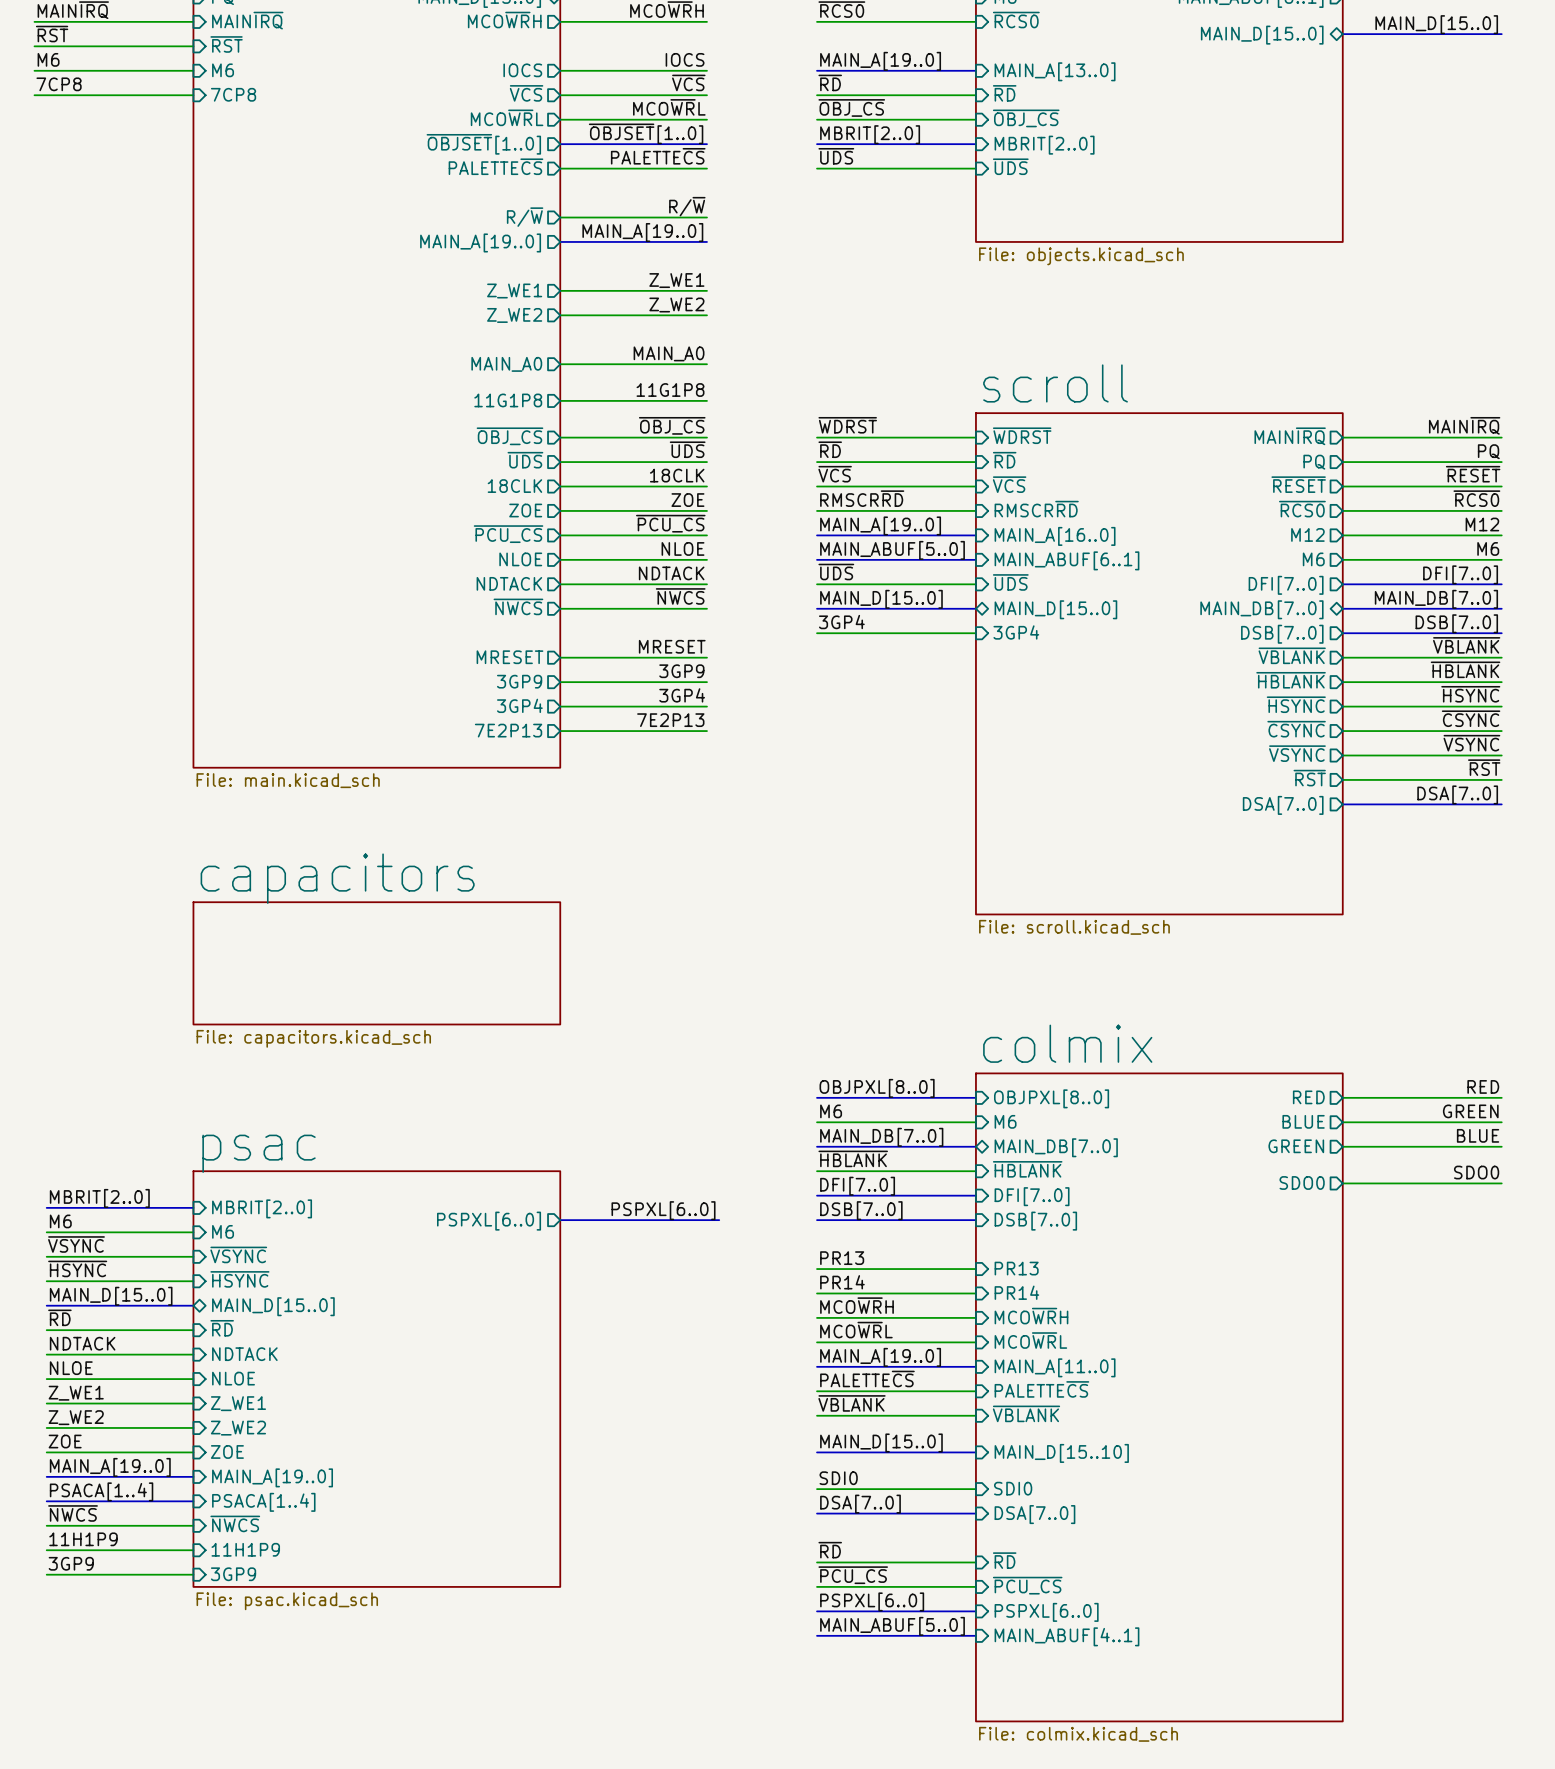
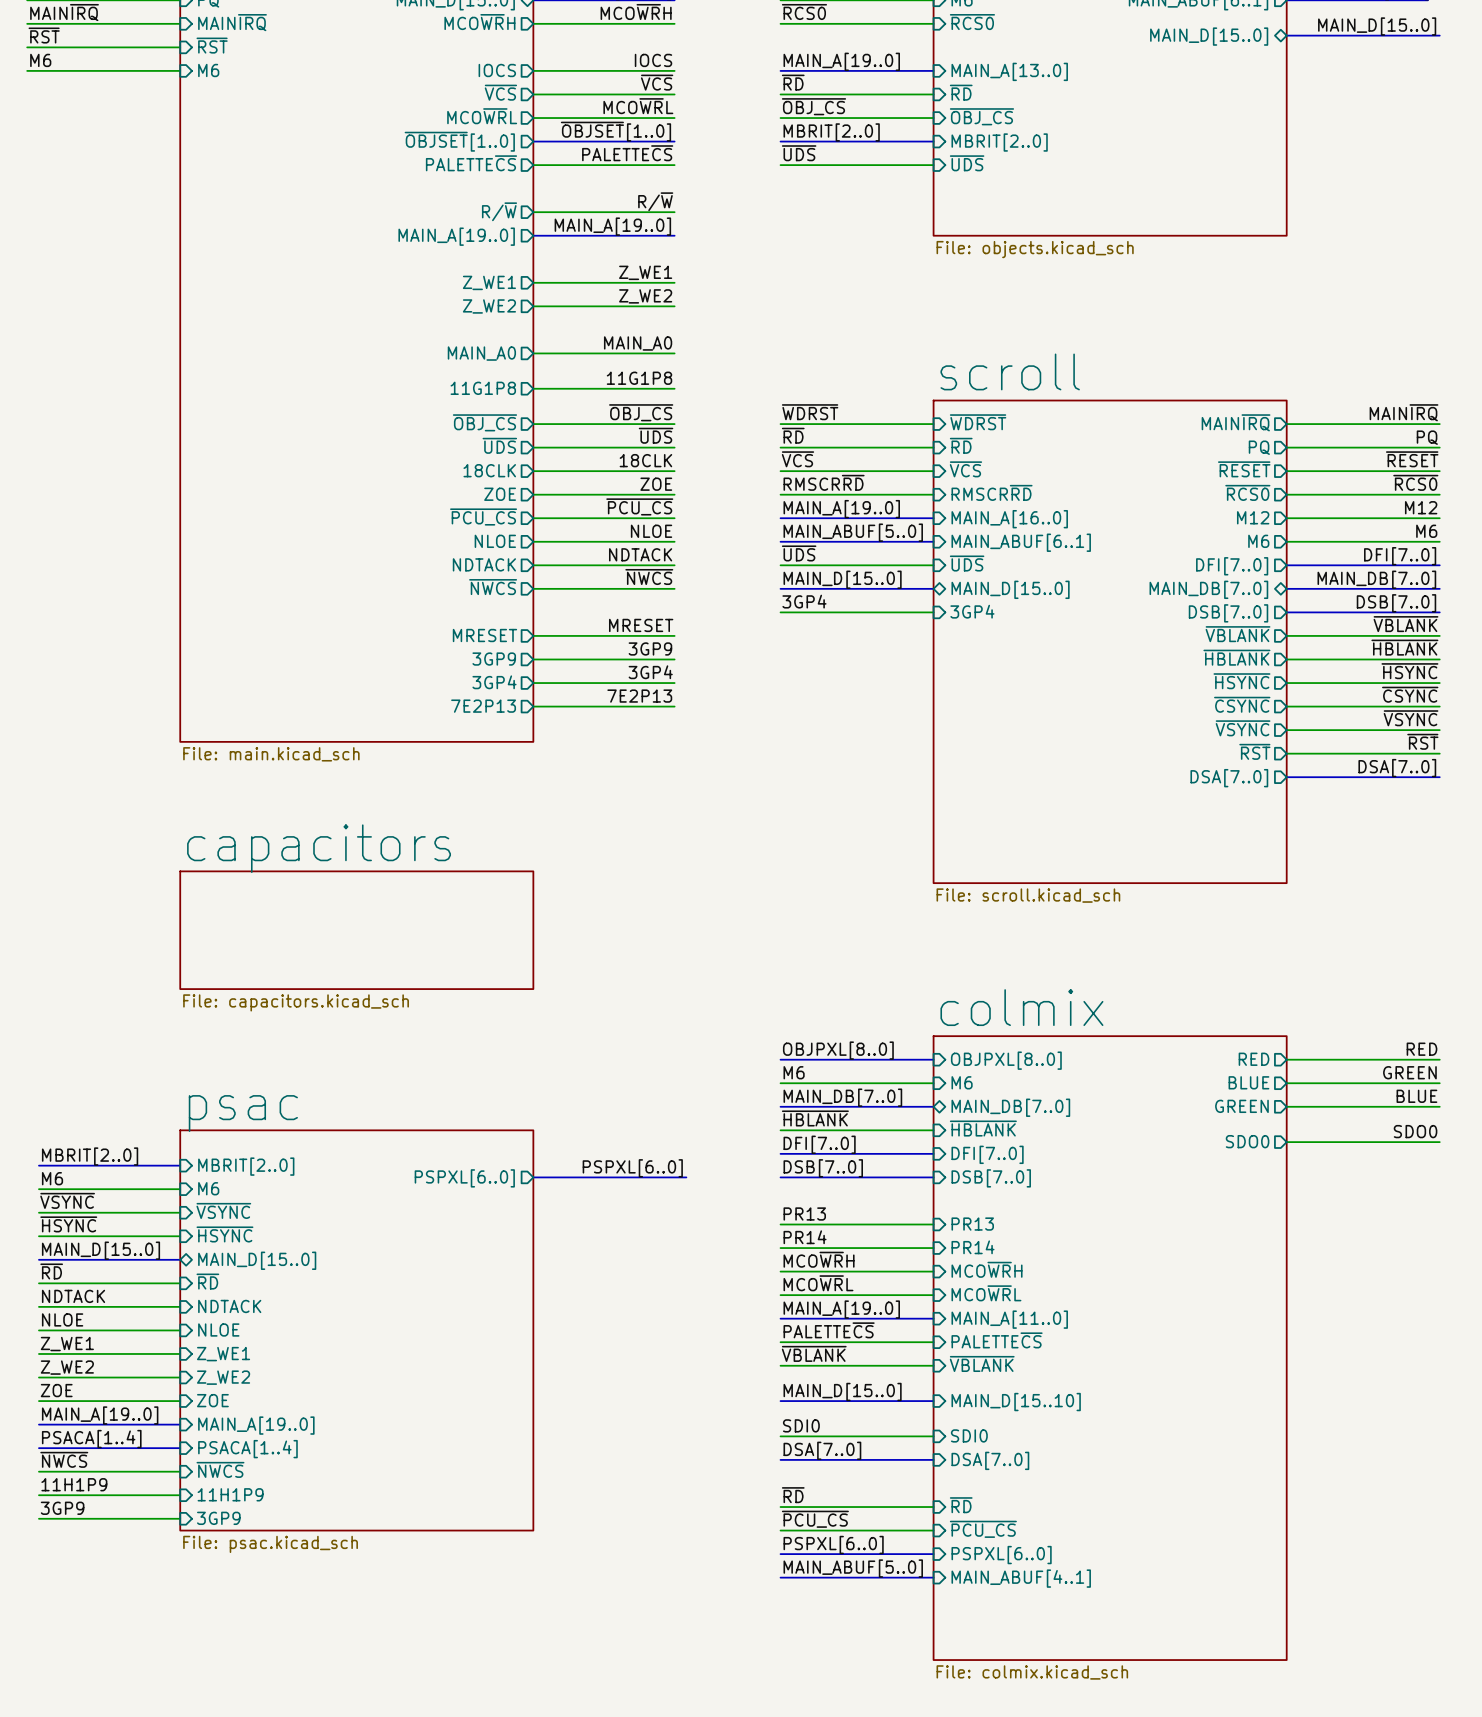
label: 7CP8 (59, 84) -> none
sheet pin: 7CP8 (233, 94) -> none
wire: (34, 95) (193, 95) -> none

